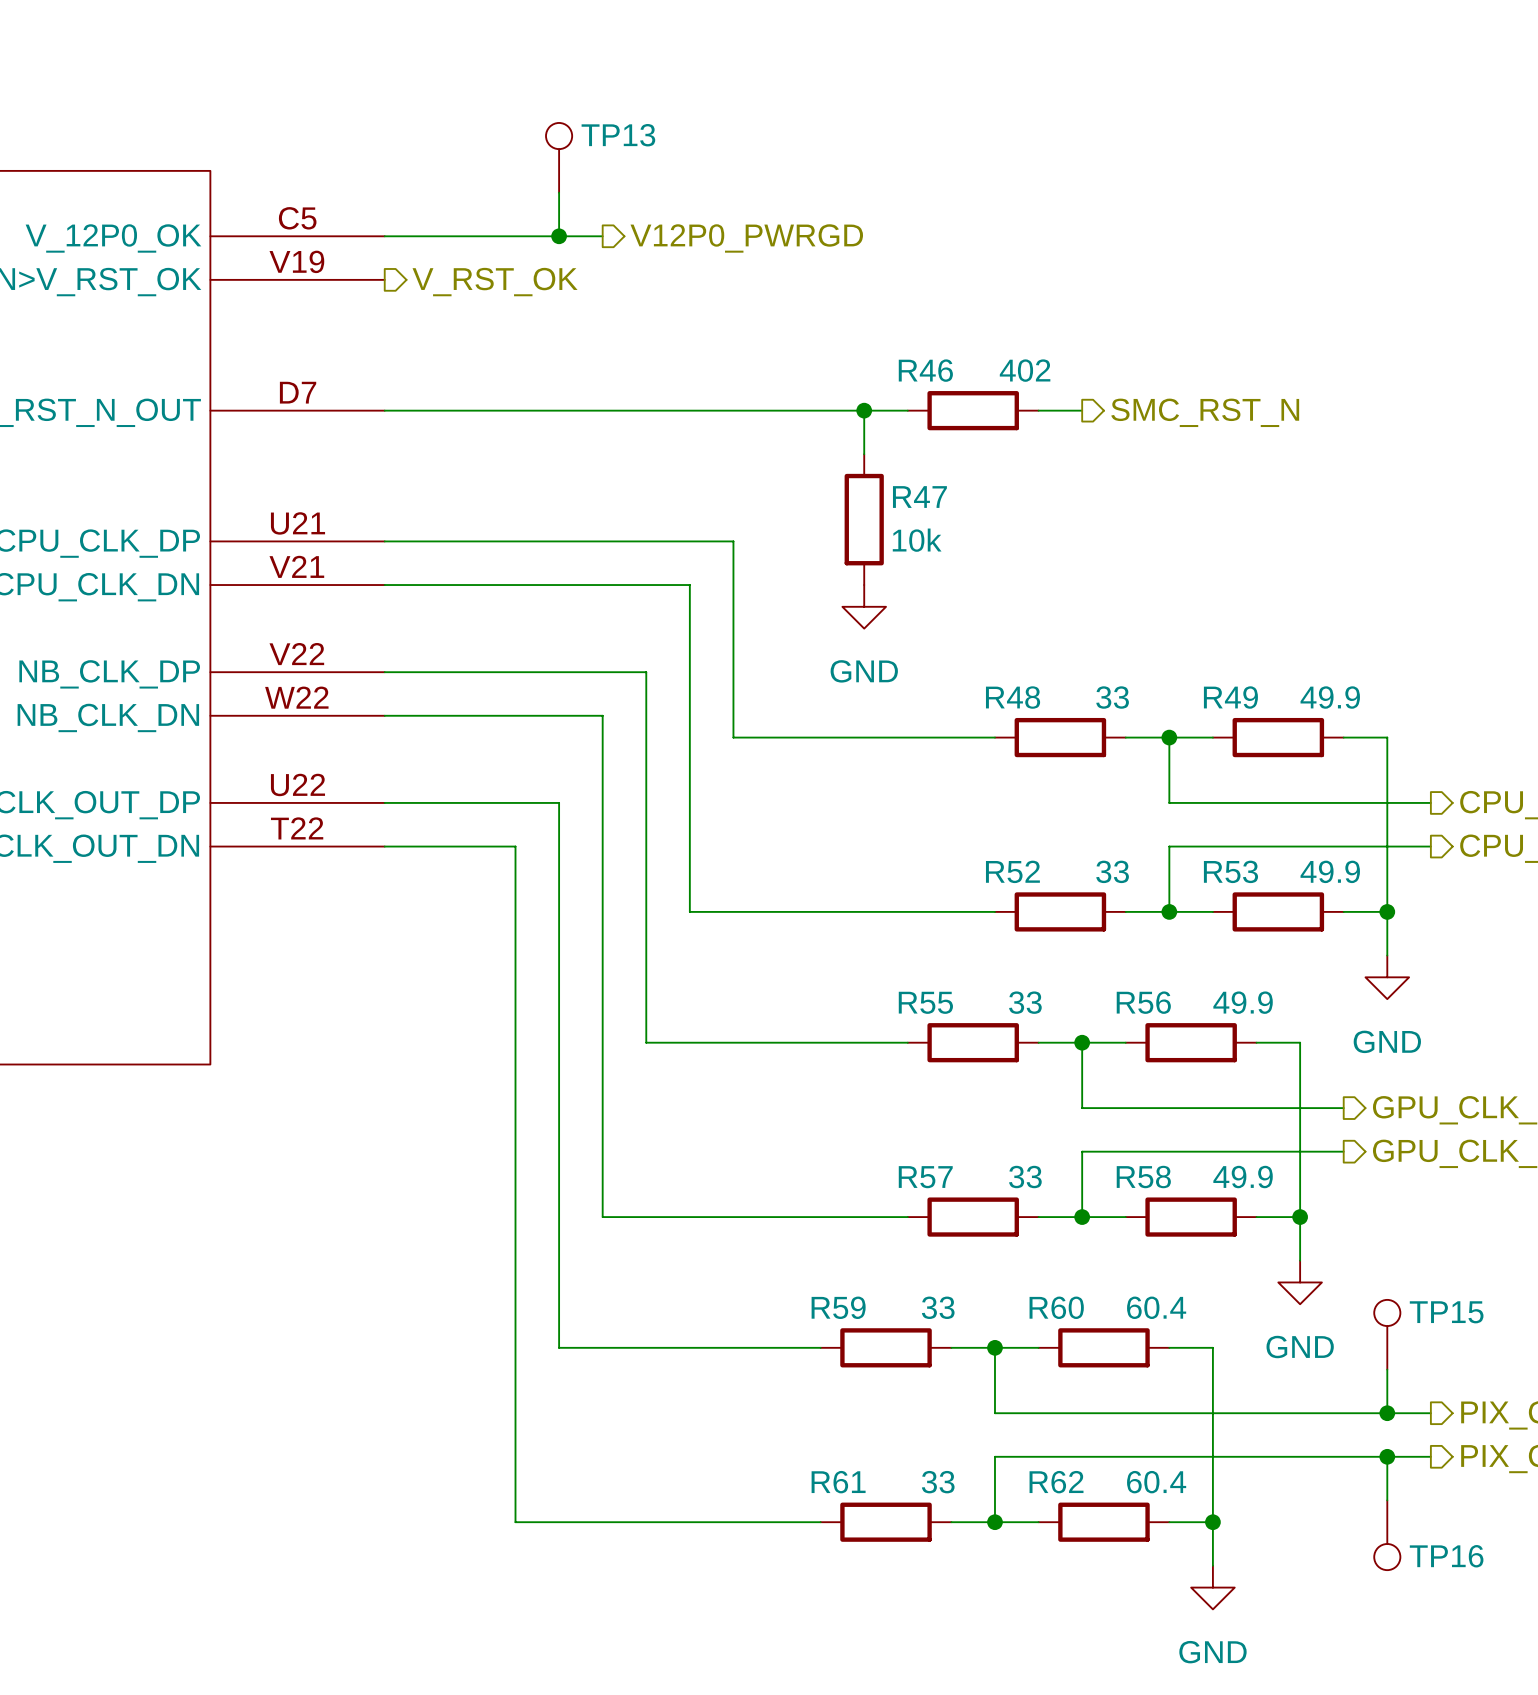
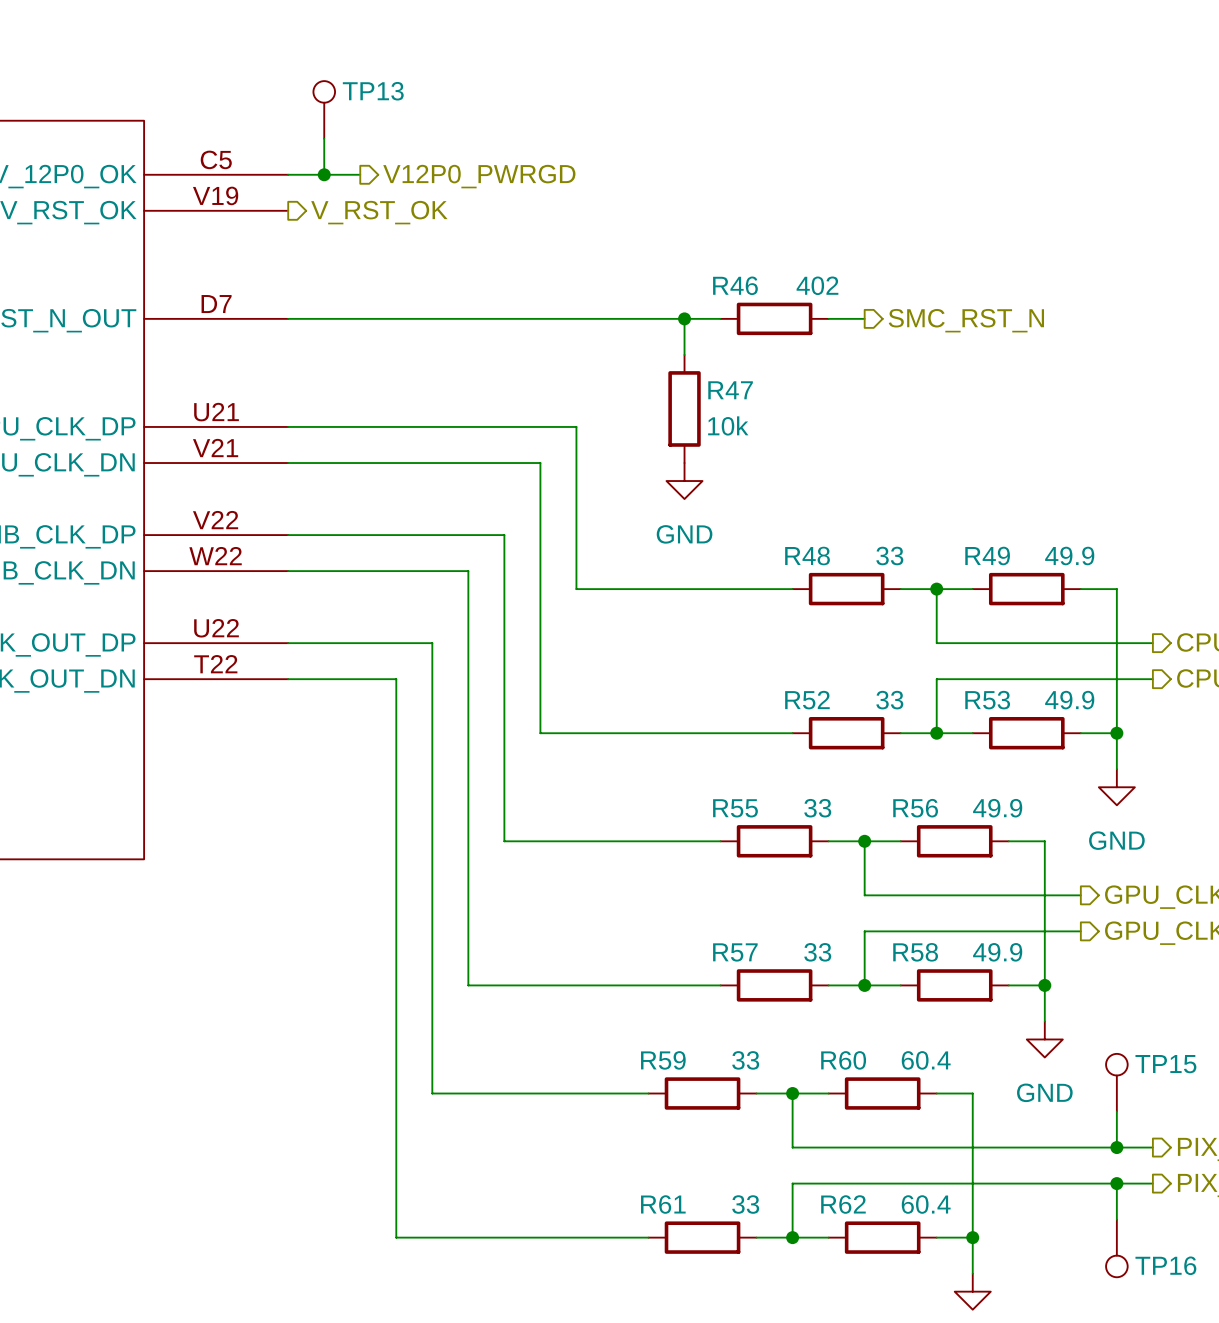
TP13 position: (559, 157) -> (324, 109)
wire: (559, 192) (559, 236) -> (324, 138) (324, 174)
junction: none -> (324, 174)
wire: (471, 236) (602, 236) -> none
junction: (559, 236) -> none
hierarchical label position: V12P0_PWRGD (746, 238) -> V12P0_PWRGD (479, 176)

